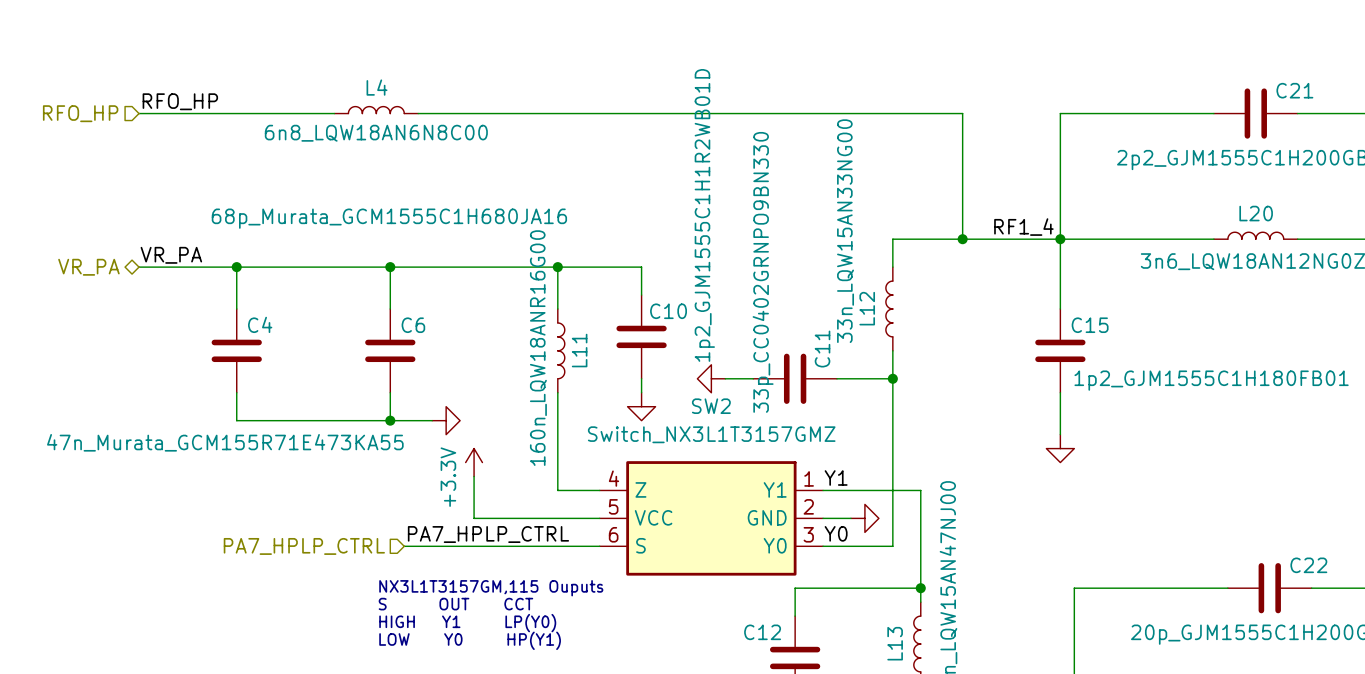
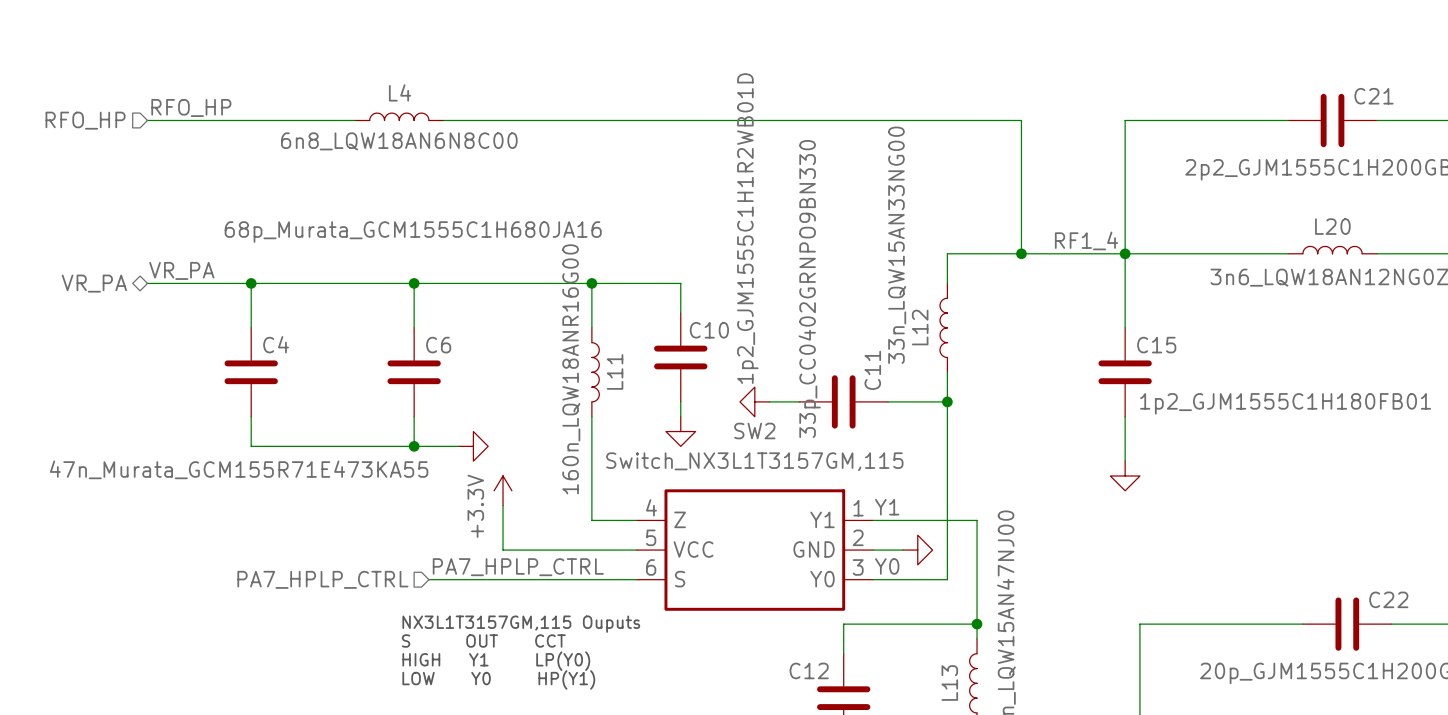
SW2 value: Switch_NX3L1T3157GMZ (711, 434) -> Switch_NX3L1T3157GM,115 (754, 461)

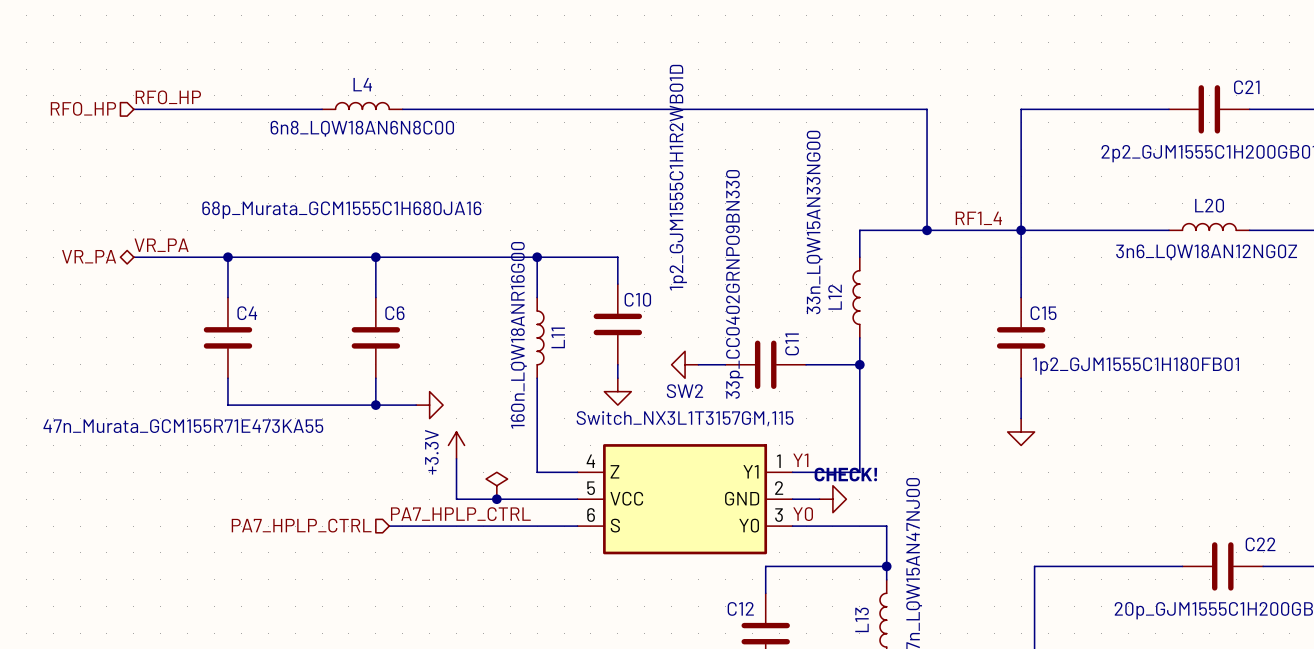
text: none -> CHECK! (845, 474)
power symbol: none -> (496, 485)
junction: none -> (496, 499)
wire: (947, 579) (947, 520) (977, 520) (977, 579) -> (859, 526) (886, 526)
text: NX3L1T3157GM,115 Ouputs (521, 624) -> none
text: S OUT CCT (483, 641) -> none
text: HIGH Y1 LP(Y0) (496, 661) -> none
text: LOW Y0 HP(Y1) (498, 679) -> none

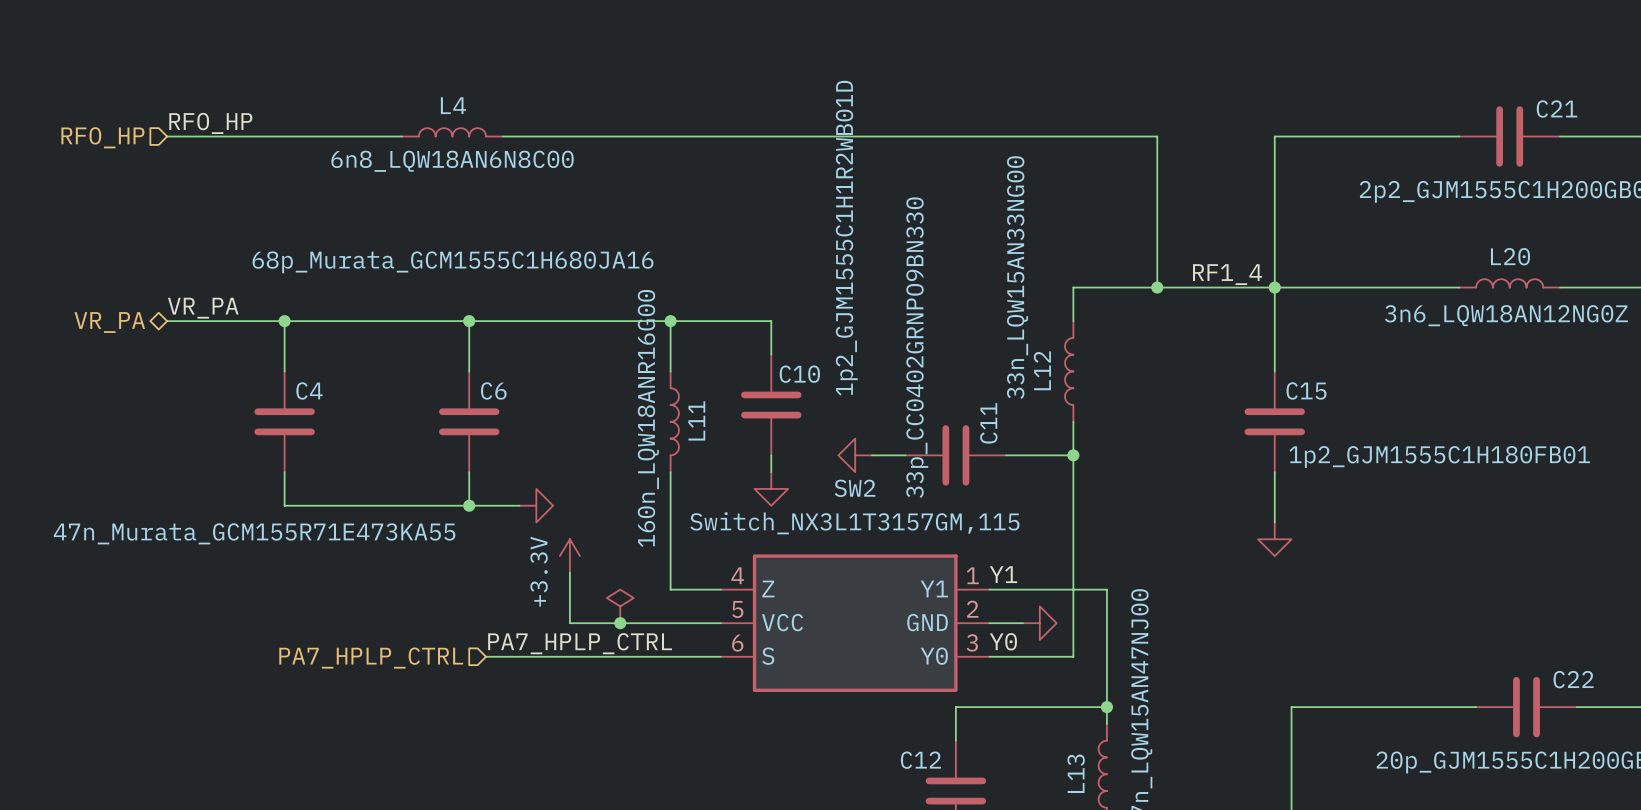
text: CHECK! (845, 474) -> none
wire: (859, 526) (886, 526) -> (1073, 656) (1073, 589) (1106, 589) (1106, 656)

